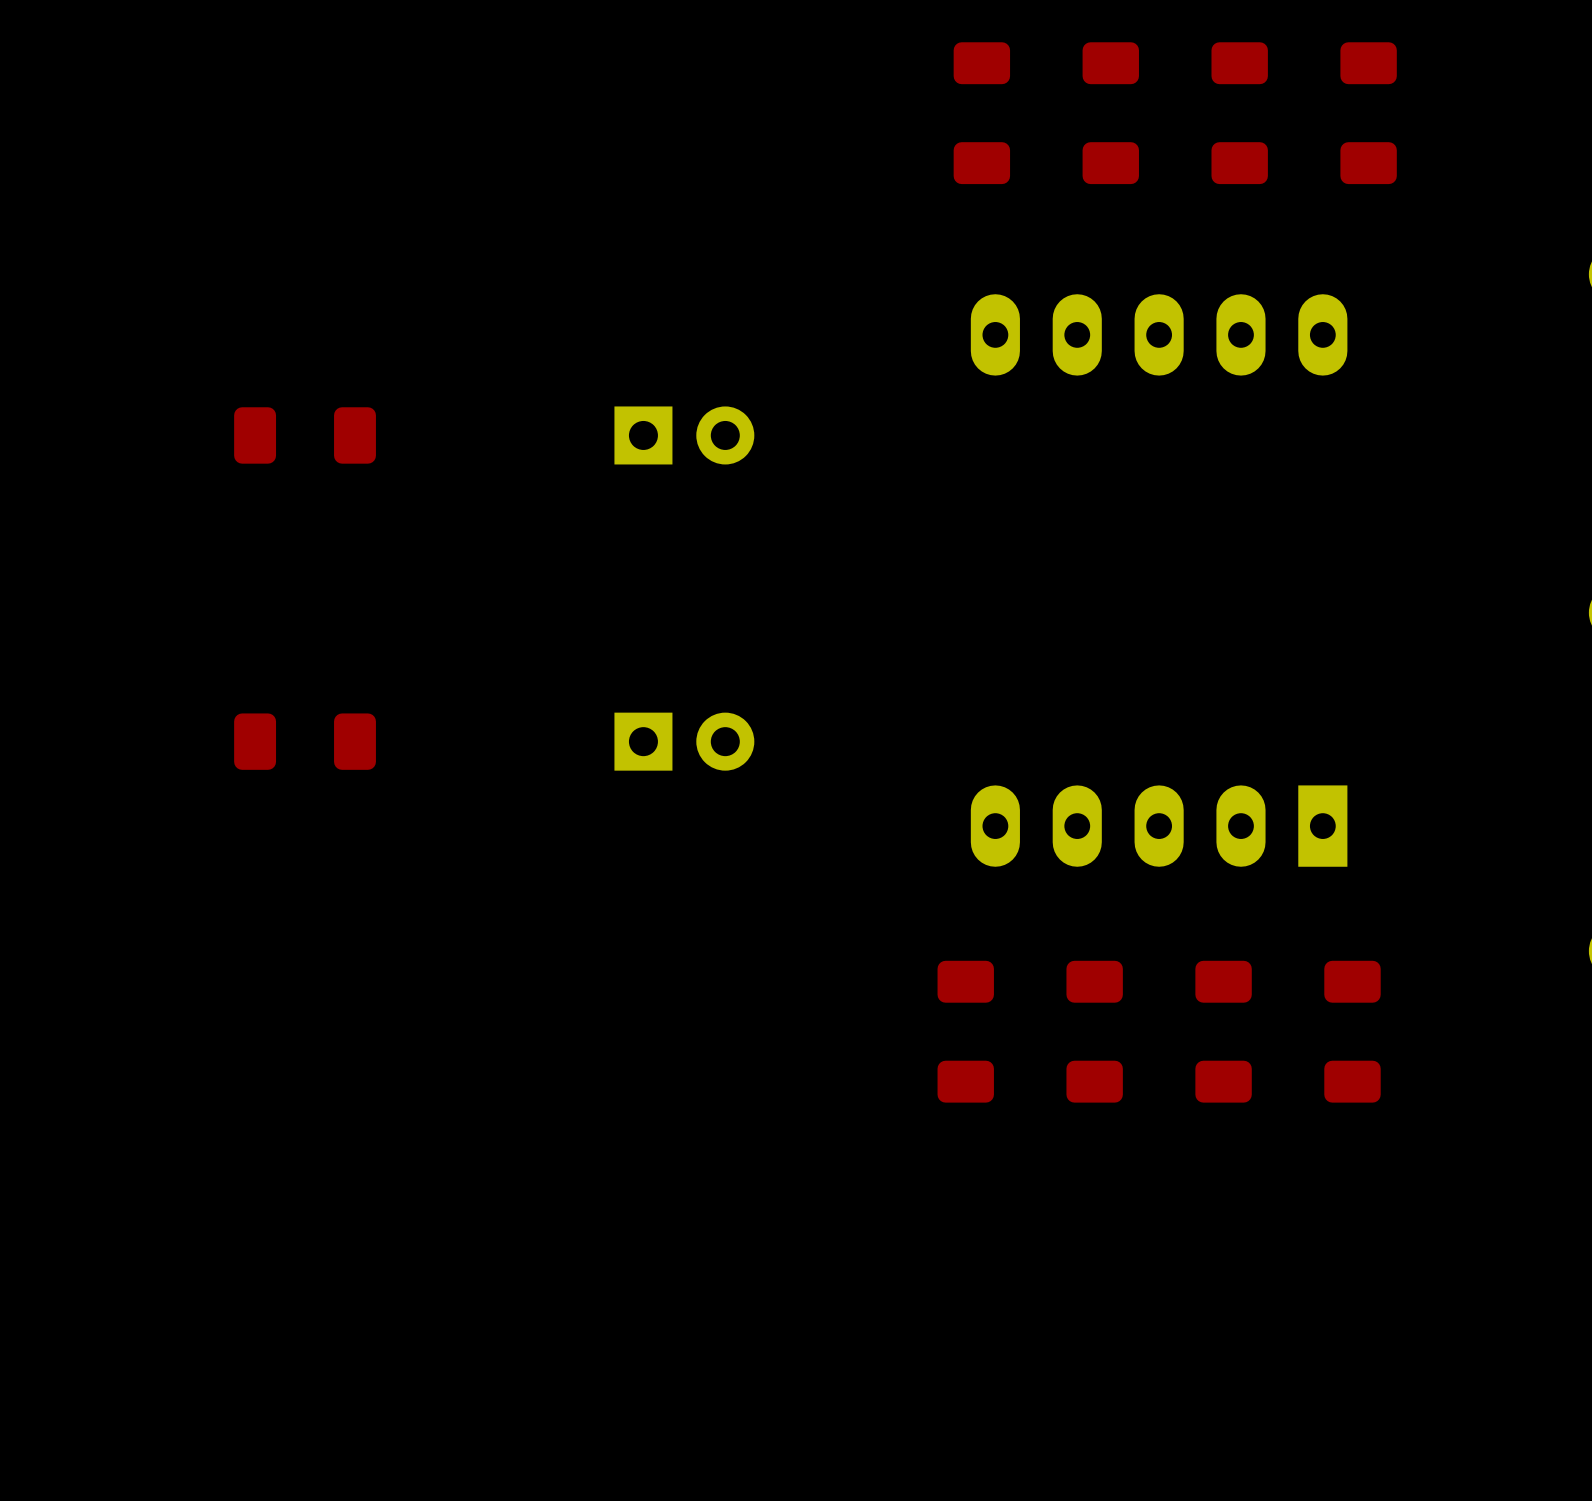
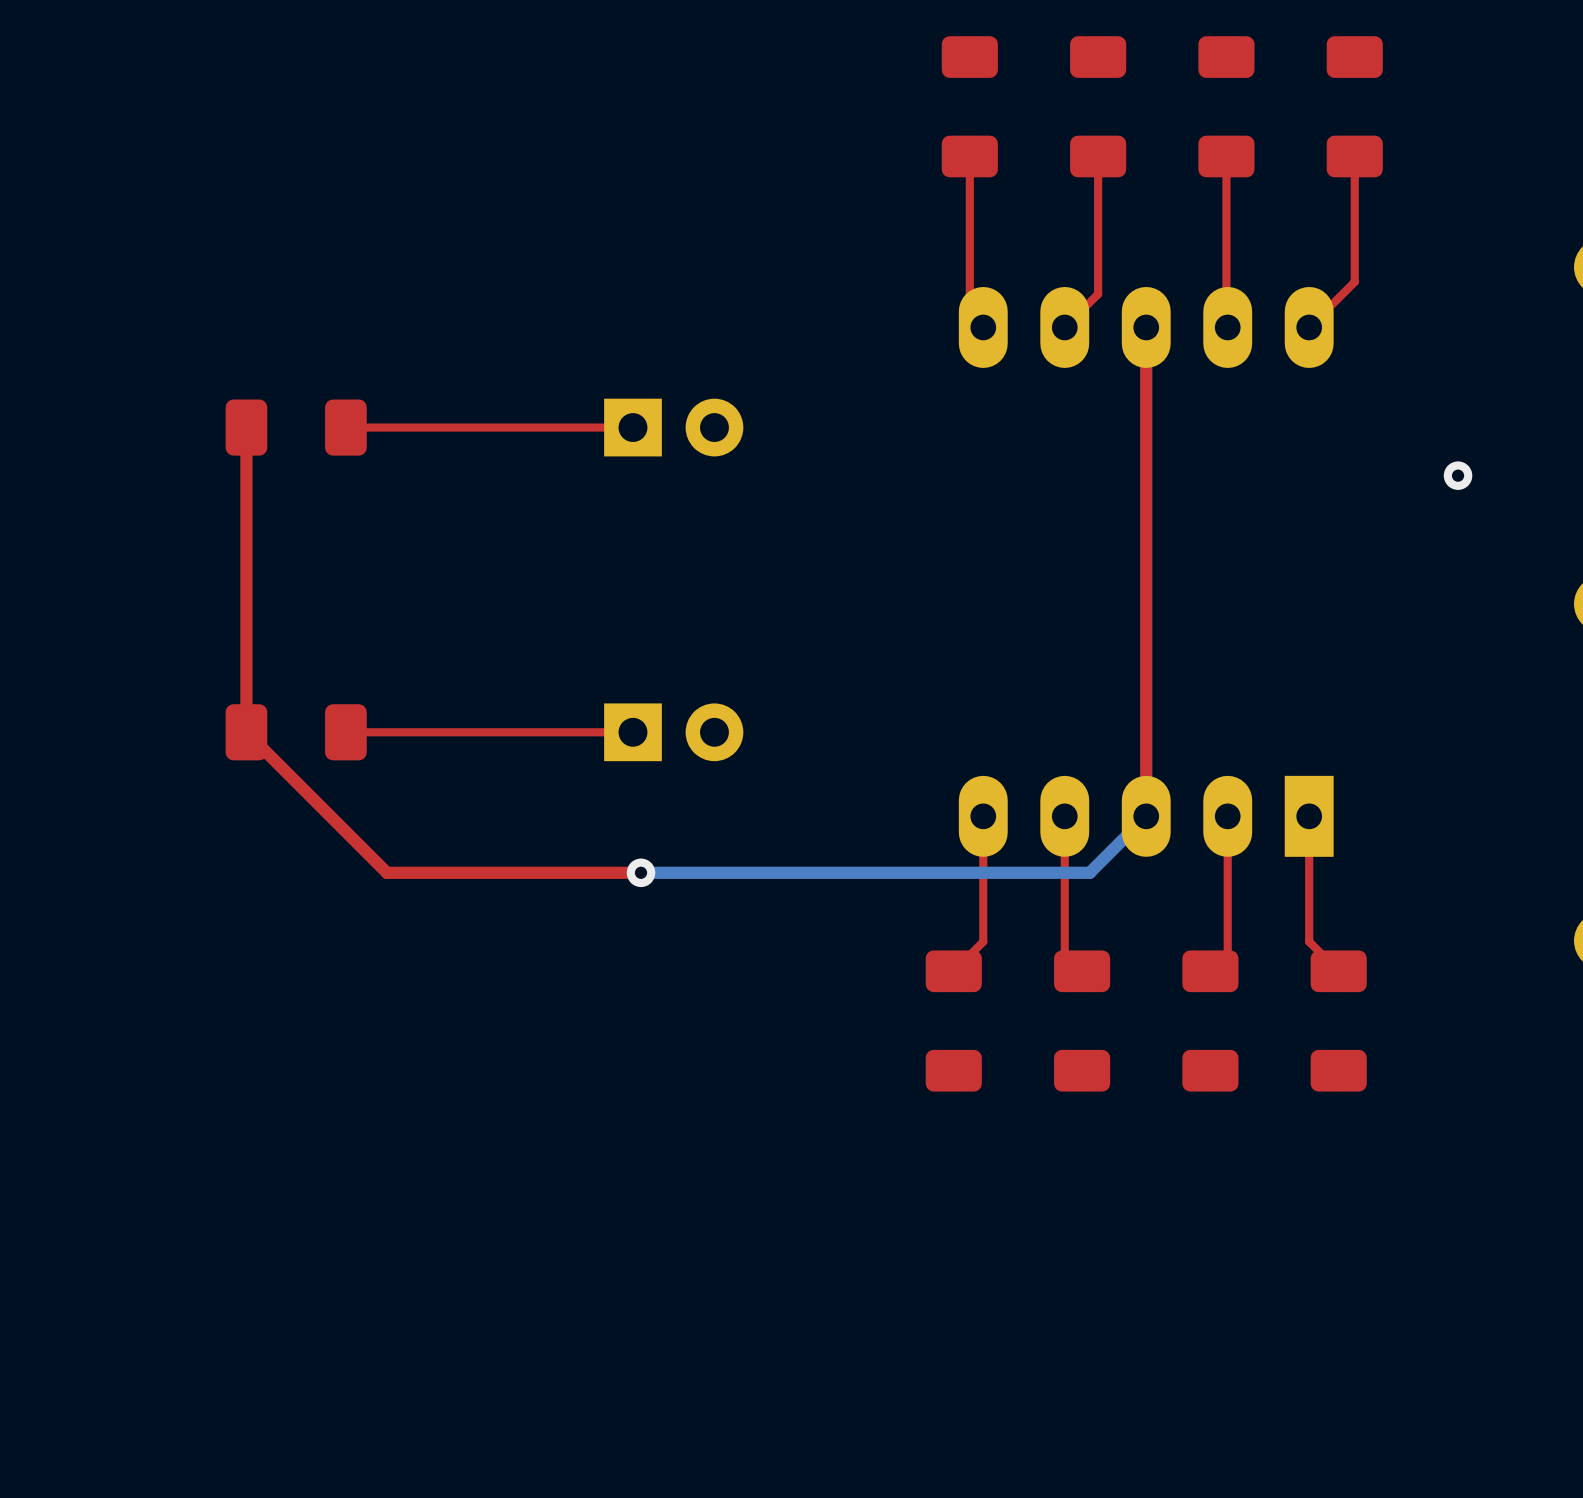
top track: none -> (969, 156) (969, 313) (983, 327)
top track: none -> (1098, 156) (1098, 294) (1064, 327)
top track: none -> (1226, 156) (1227, 327)
top track: none -> (1354, 156) (1354, 281) (1309, 327)
top track: none -> (1146, 327) (1146, 816)
top track: none -> (246, 427) (246, 732) (386, 872) (643, 872)
top track: none -> (632, 427) (345, 427)
via: none -> (1458, 475)
top track: none -> (632, 732) (345, 732)
top track: none -> (983, 816) (983, 941) (953, 971)
top track: none -> (1064, 816) (1064, 953) (1082, 971)
bottom track: none -> (1146, 816) (1089, 872) (641, 872)
top track: none -> (1227, 816) (1227, 953) (1210, 971)
top track: none -> (1309, 816) (1309, 941) (1338, 971)
via: none -> (641, 872)

